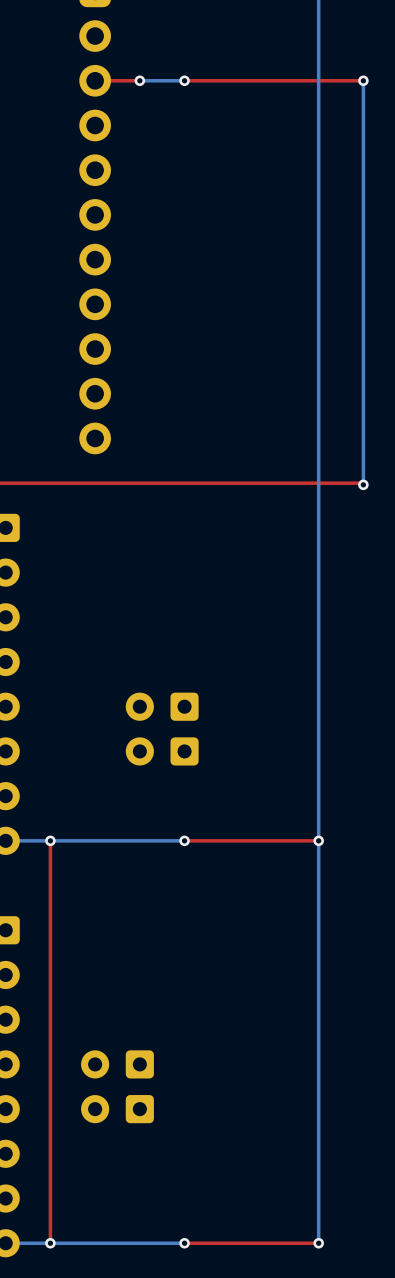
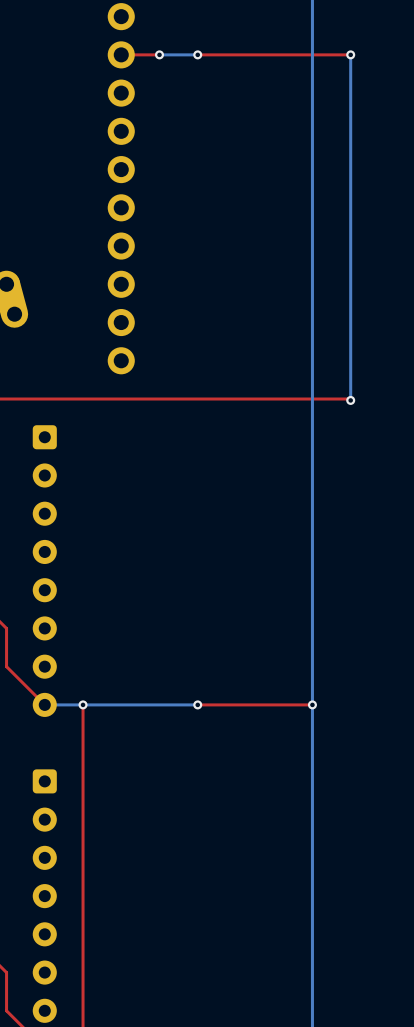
part: (162, 706) -> none
part: (162, 751) -> none
part: (117, 1064) -> none
part: (117, 1109) -> none

